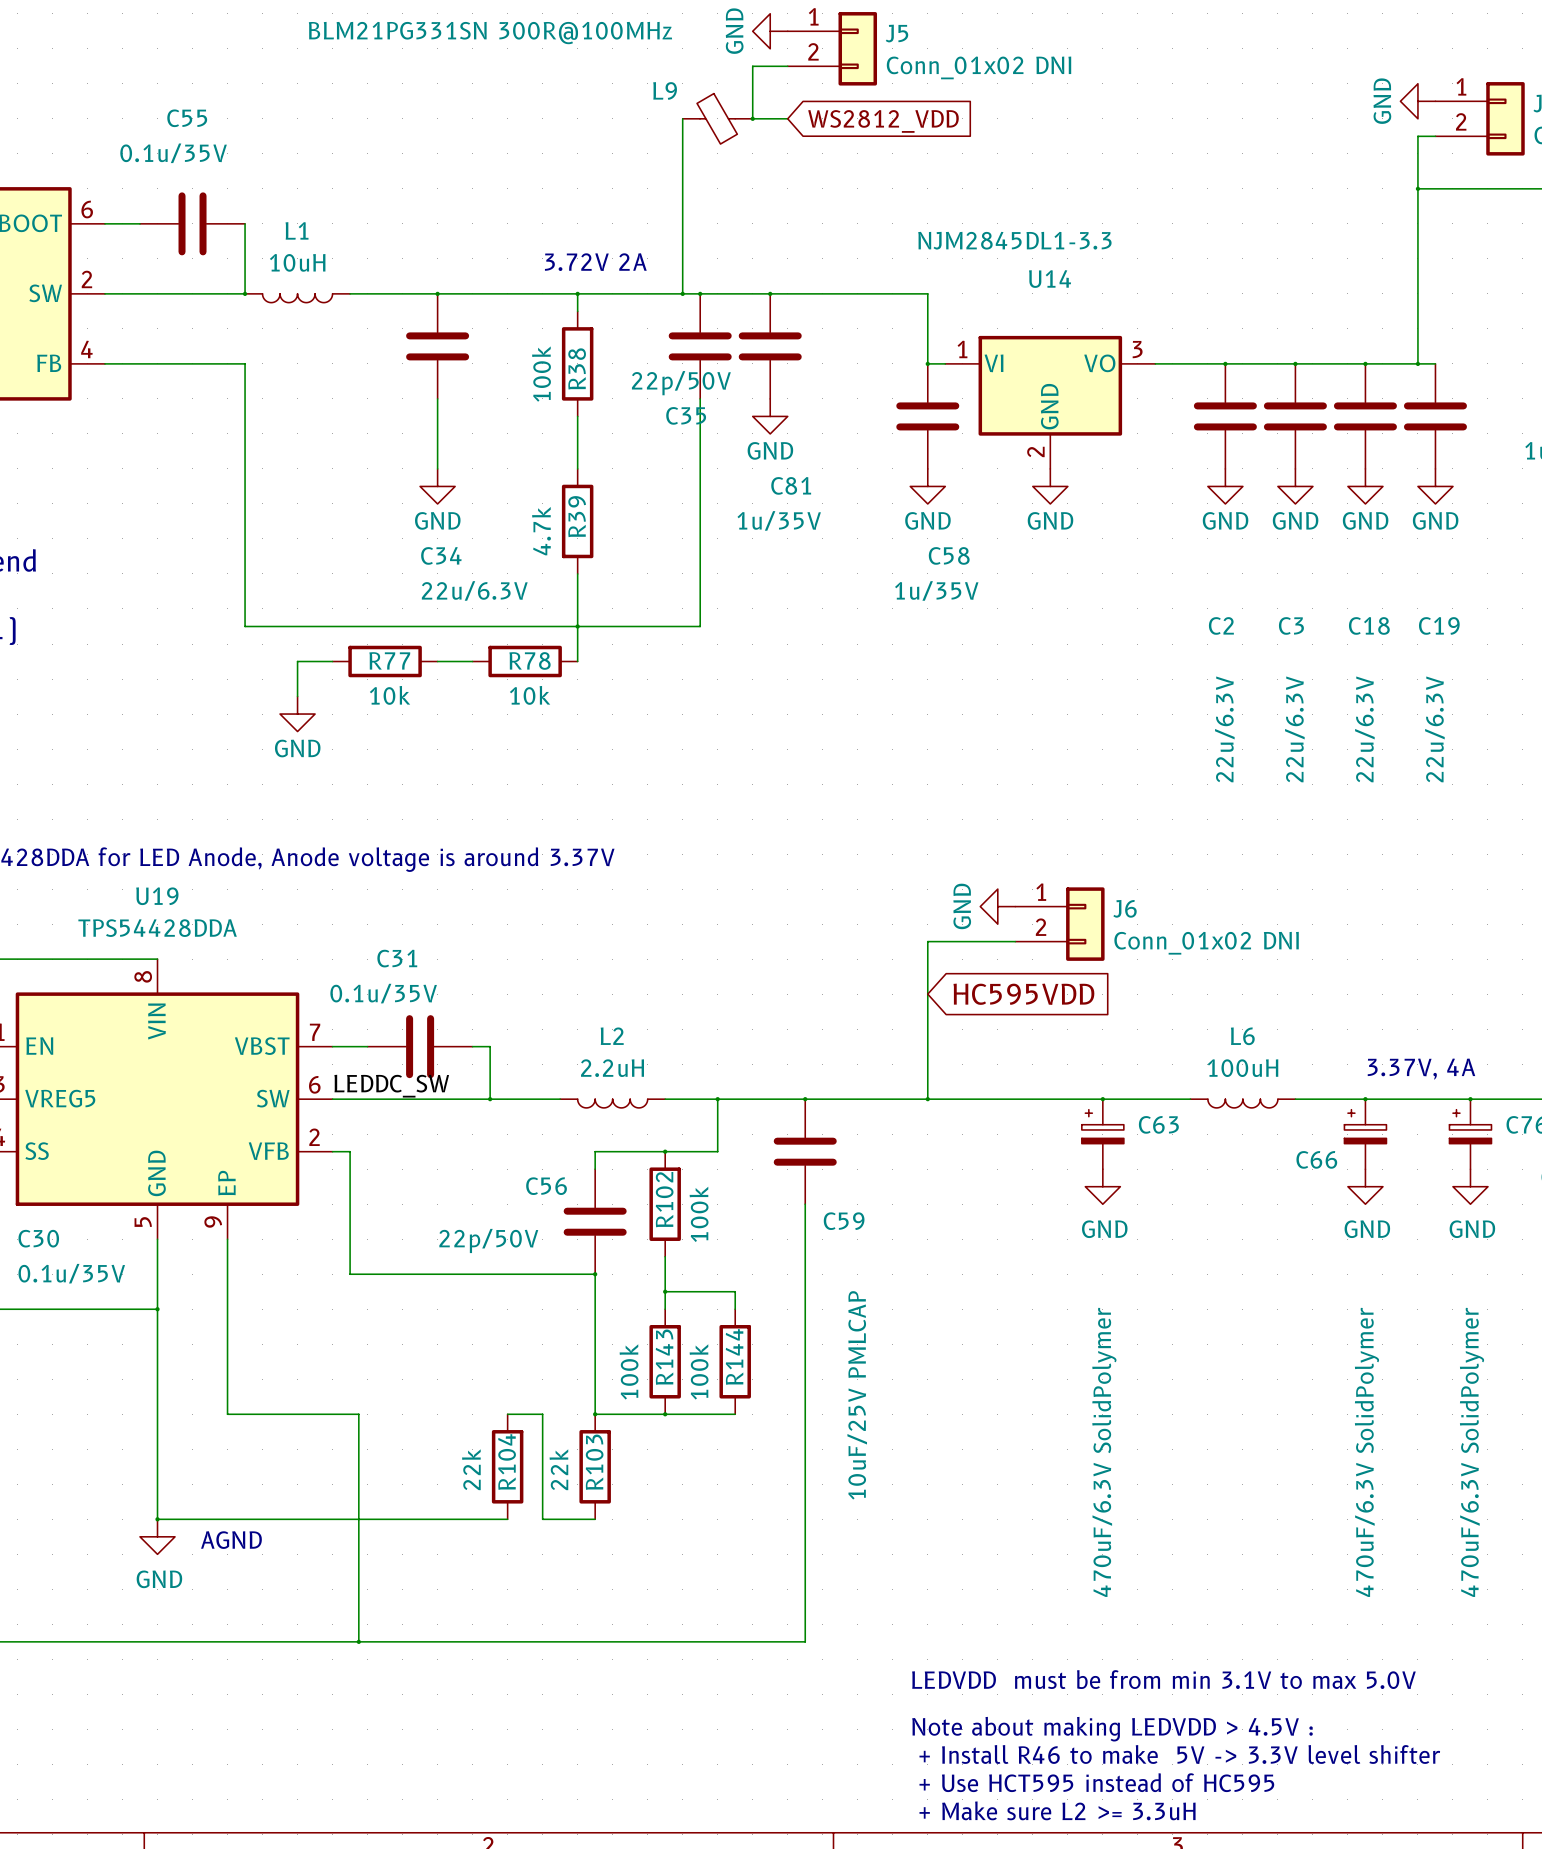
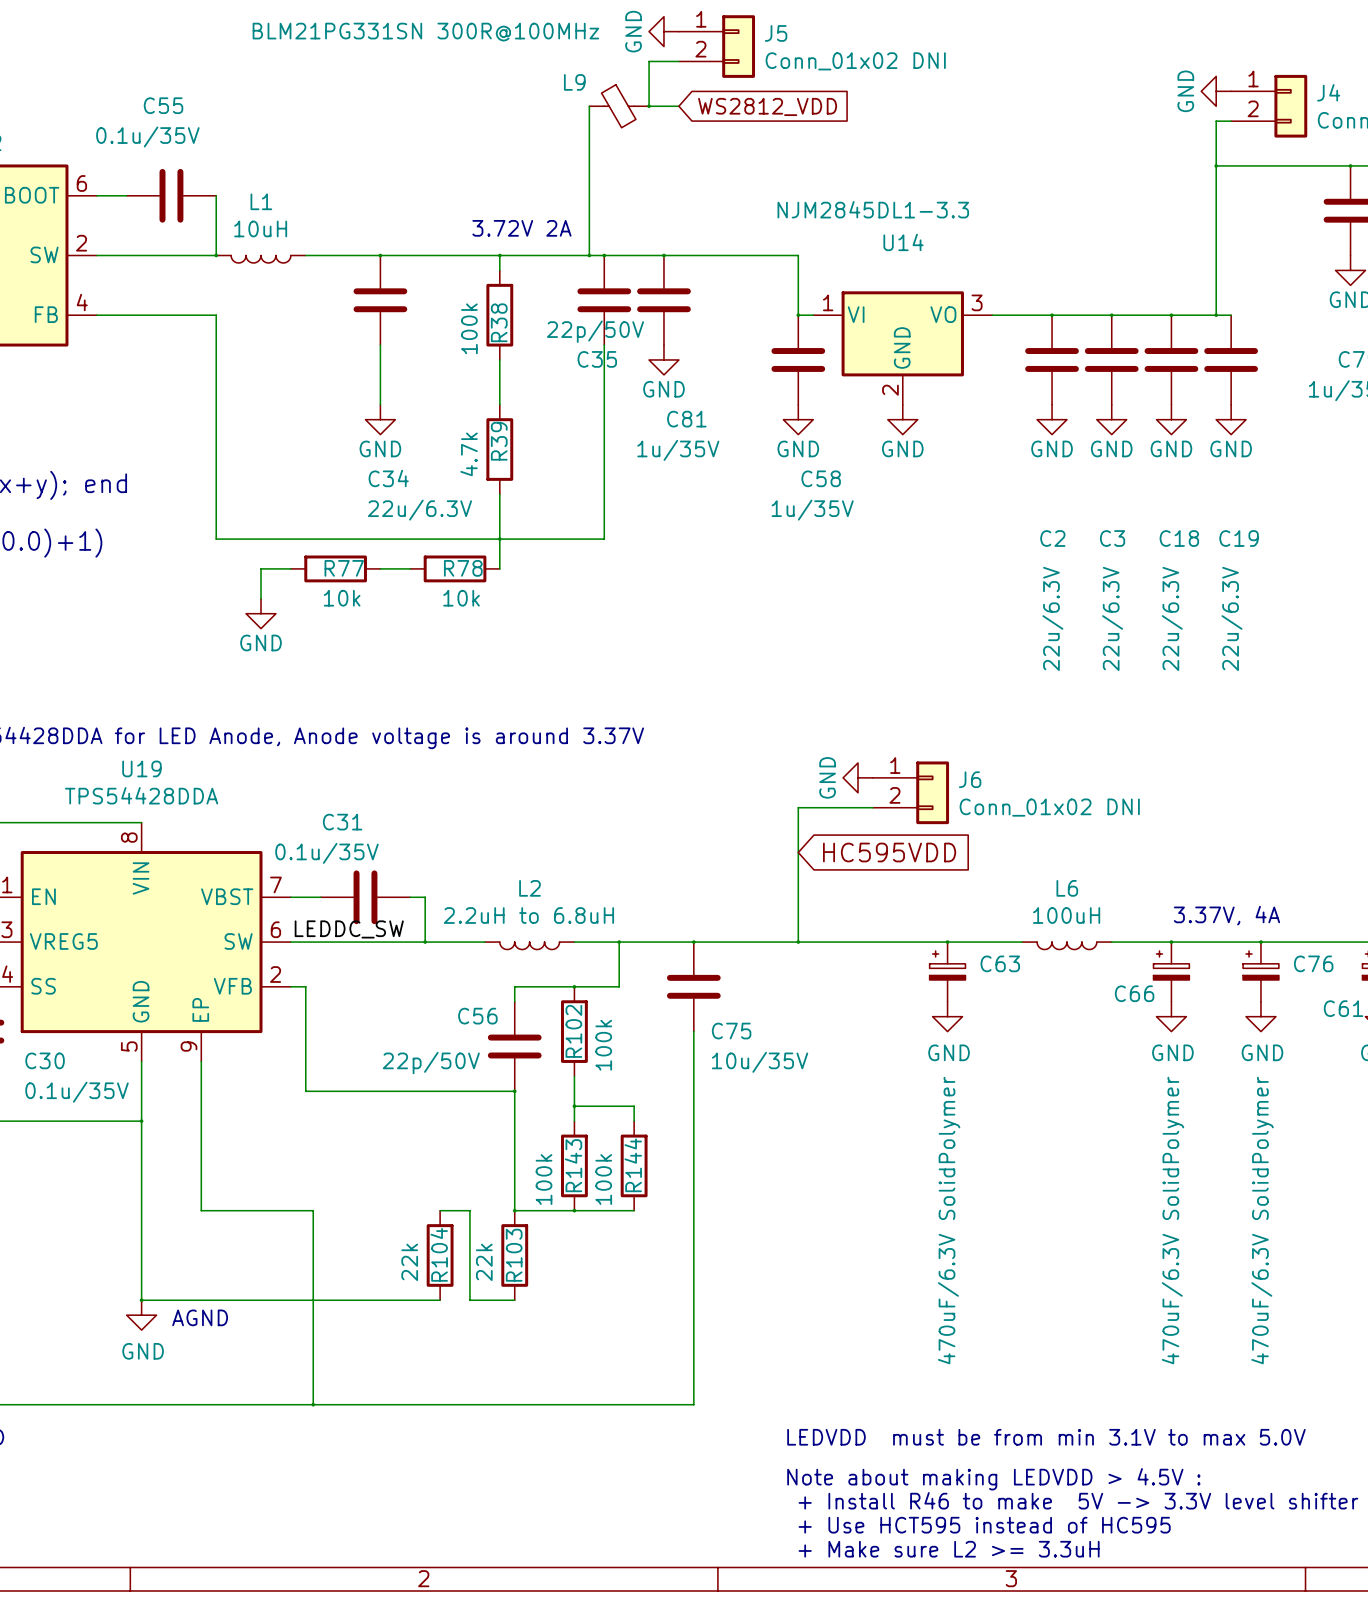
L2 value: 2.2uH (612, 1068) -> 2.2uH to 6.8uH (528, 915)
C59 name: C59 (844, 1221) -> C75 (731, 1031)
C59 value: 10uF/25V PMLCAP (857, 1395) -> 10u/35V (760, 1062)

